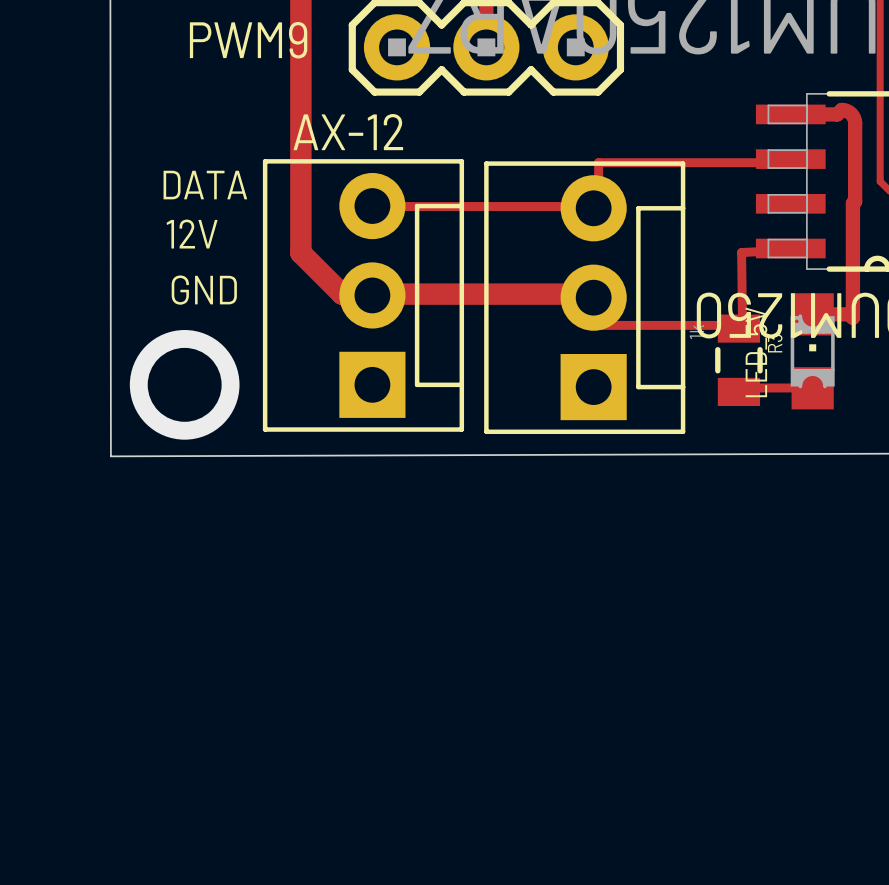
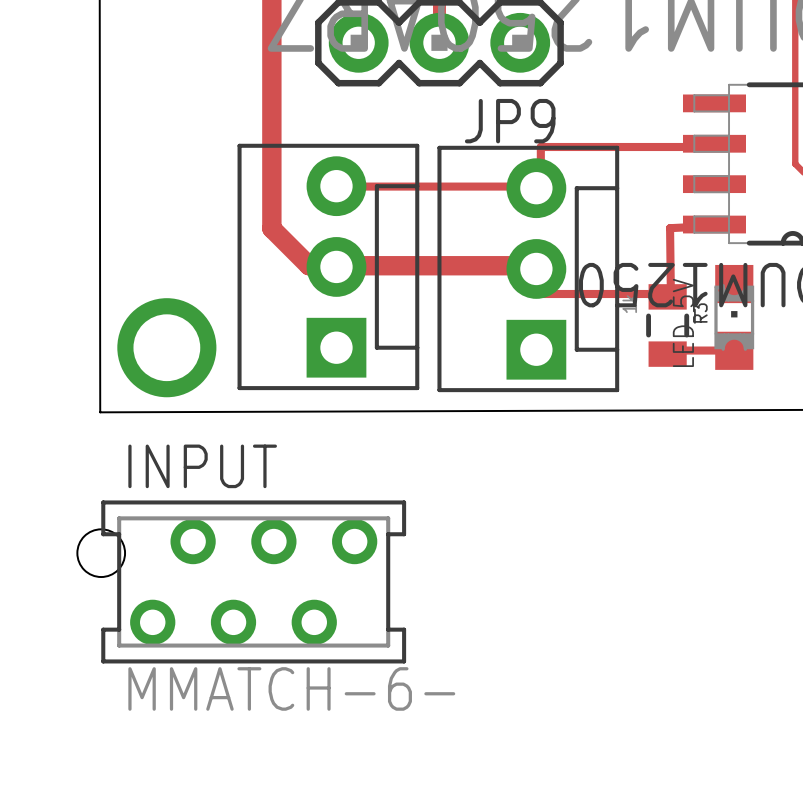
PWM9 name: PWM9 (248, 40) -> JP9 (510, 121)
track: (790, 114) (837, 114) (843, 110) (851, 113) (855, 121) (852, 317) (849, 314) (811, 312) (816, 317) -> none
text: AX-12 (348, 132) -> none
text: DATA (205, 185) -> none
text: 12V (192, 234) -> none
text: GND (204, 290) -> none
INPUT: none -> MMATCH-6- (241, 581)

